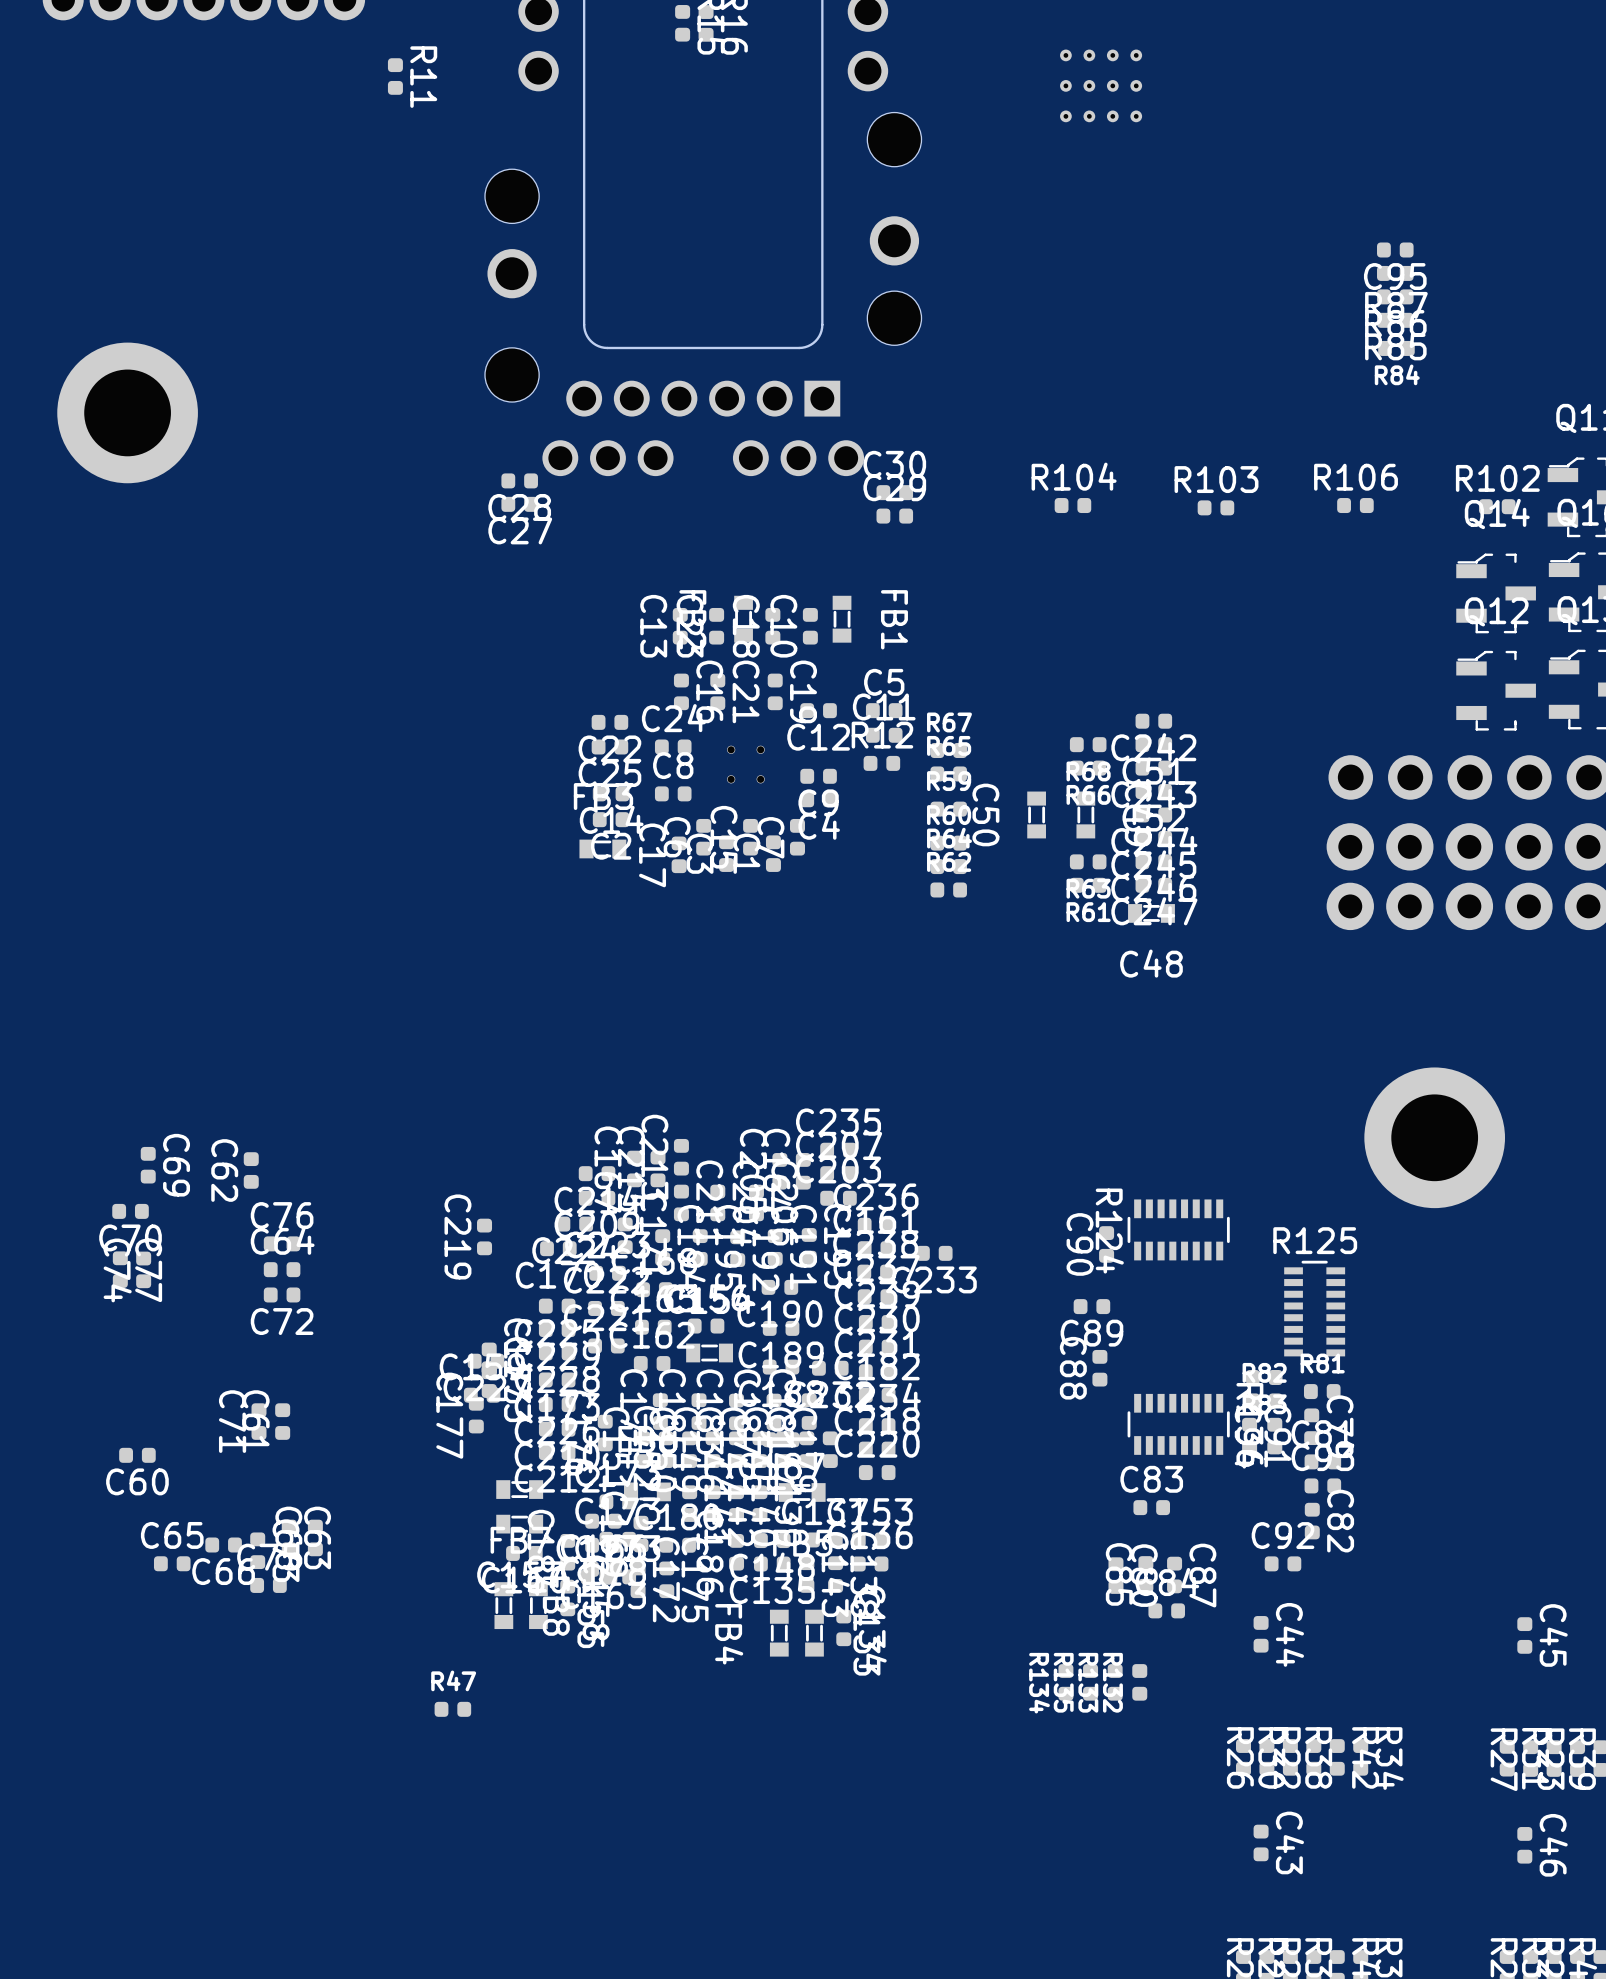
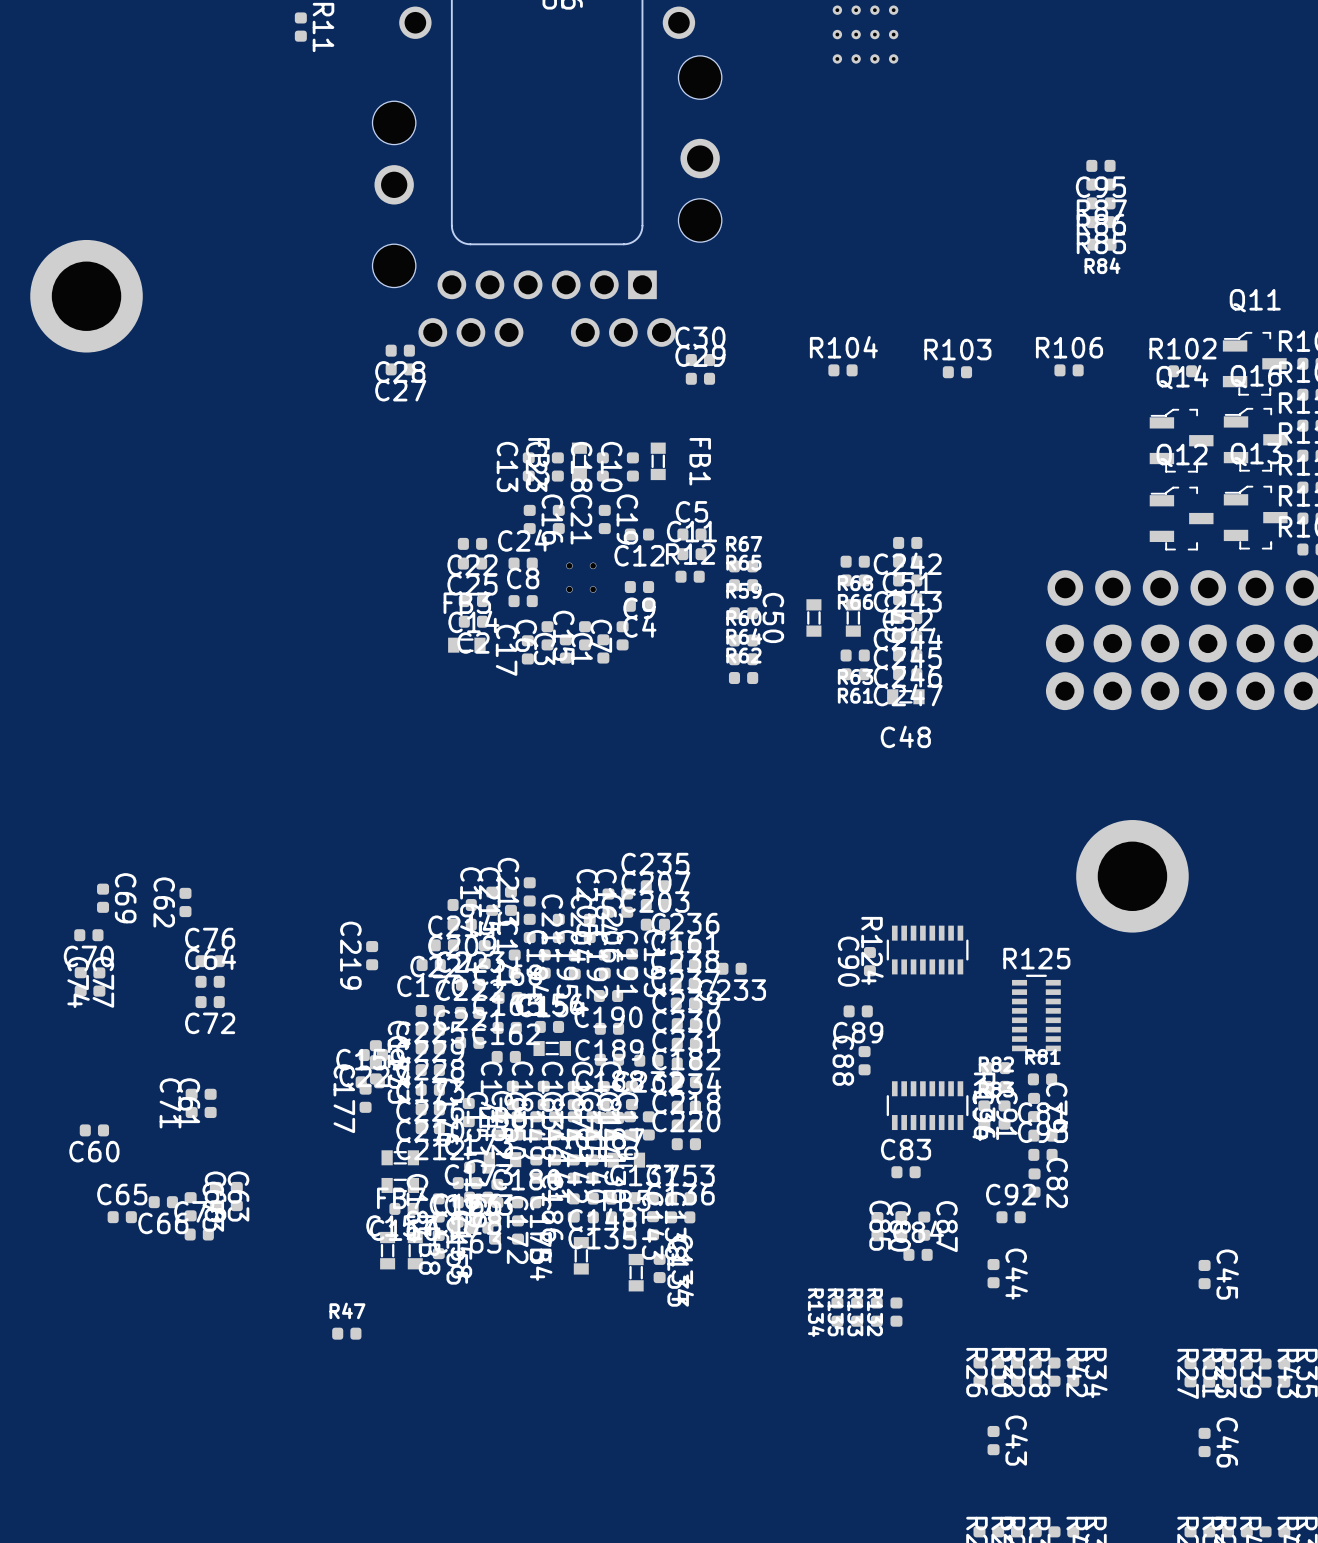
FB4 position: (779, 1633) -> (581, 1255)

